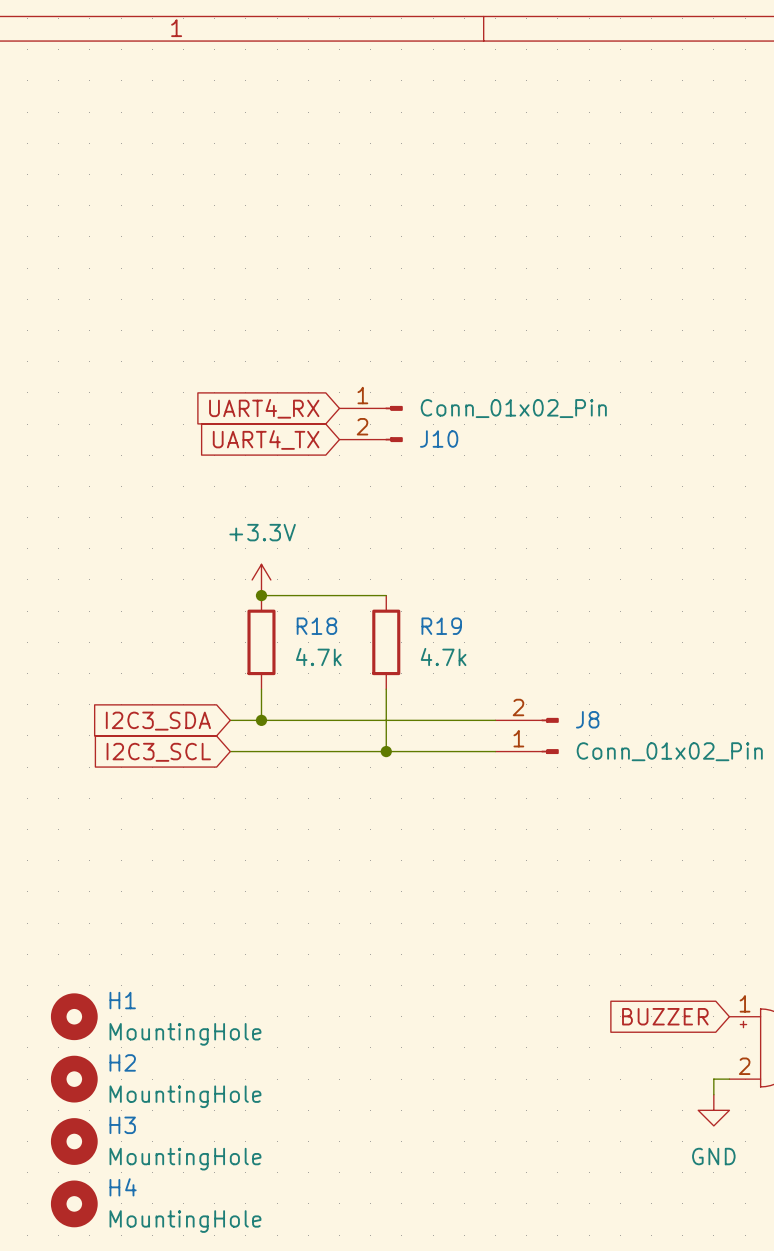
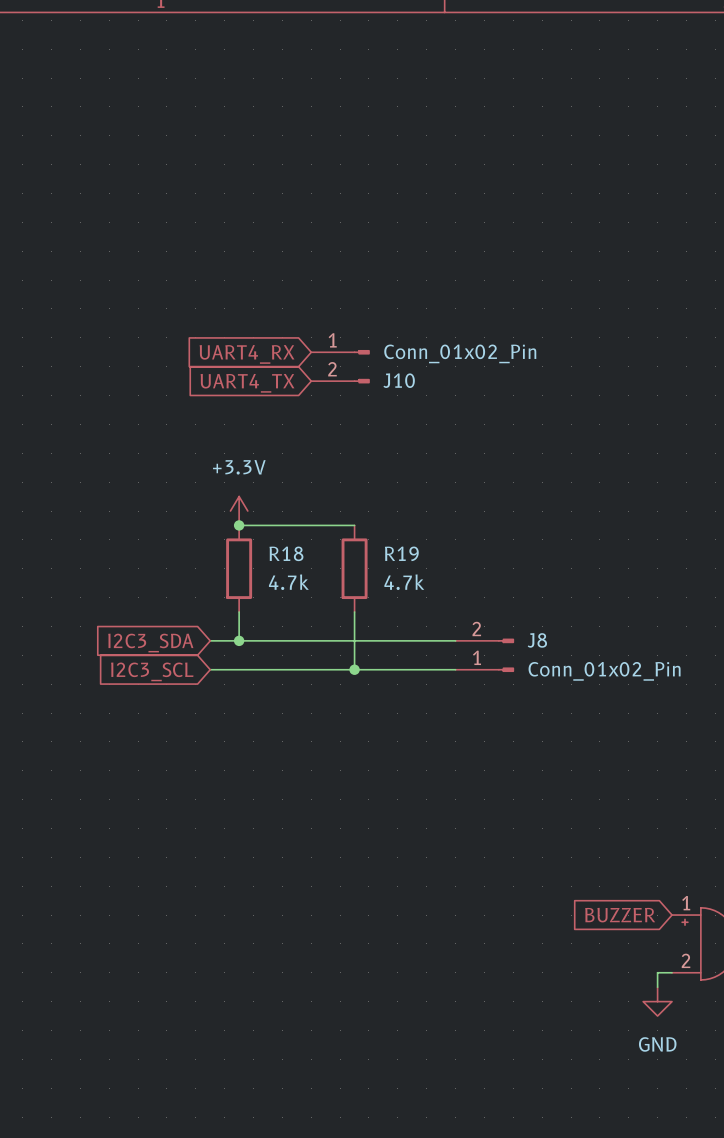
H1: MountingHole (74, 1016) -> none
H2: MountingHole (74, 1079) -> none
H3: MountingHole (74, 1141) -> none
H4: MountingHole (74, 1203) -> none

